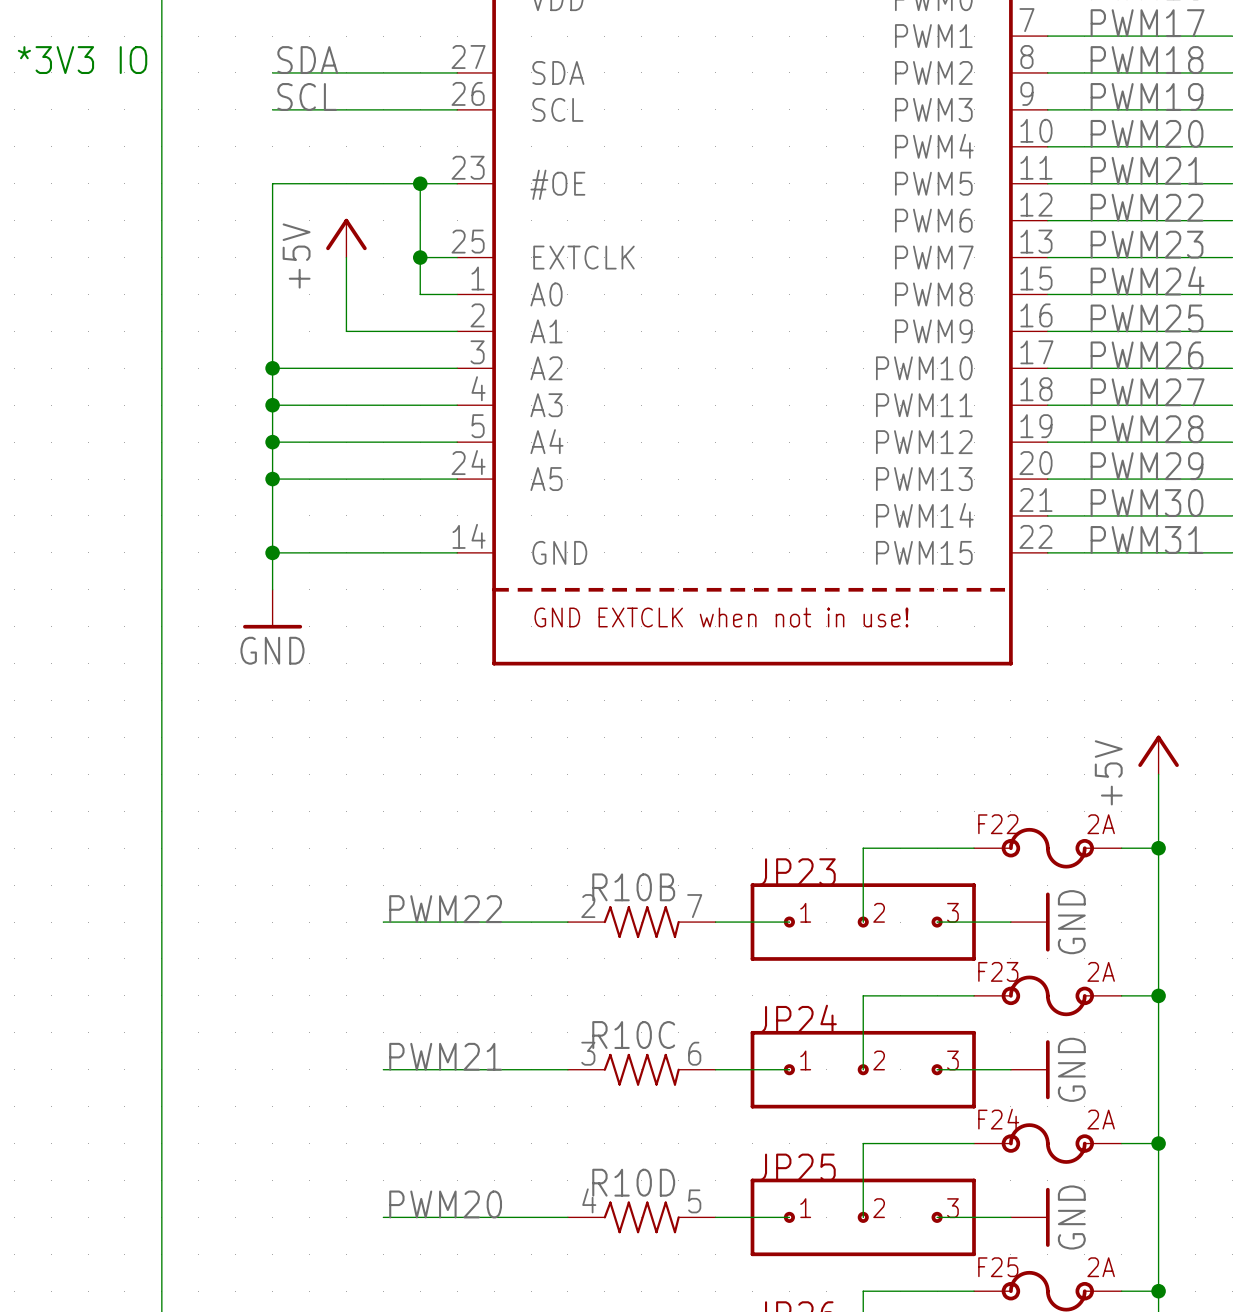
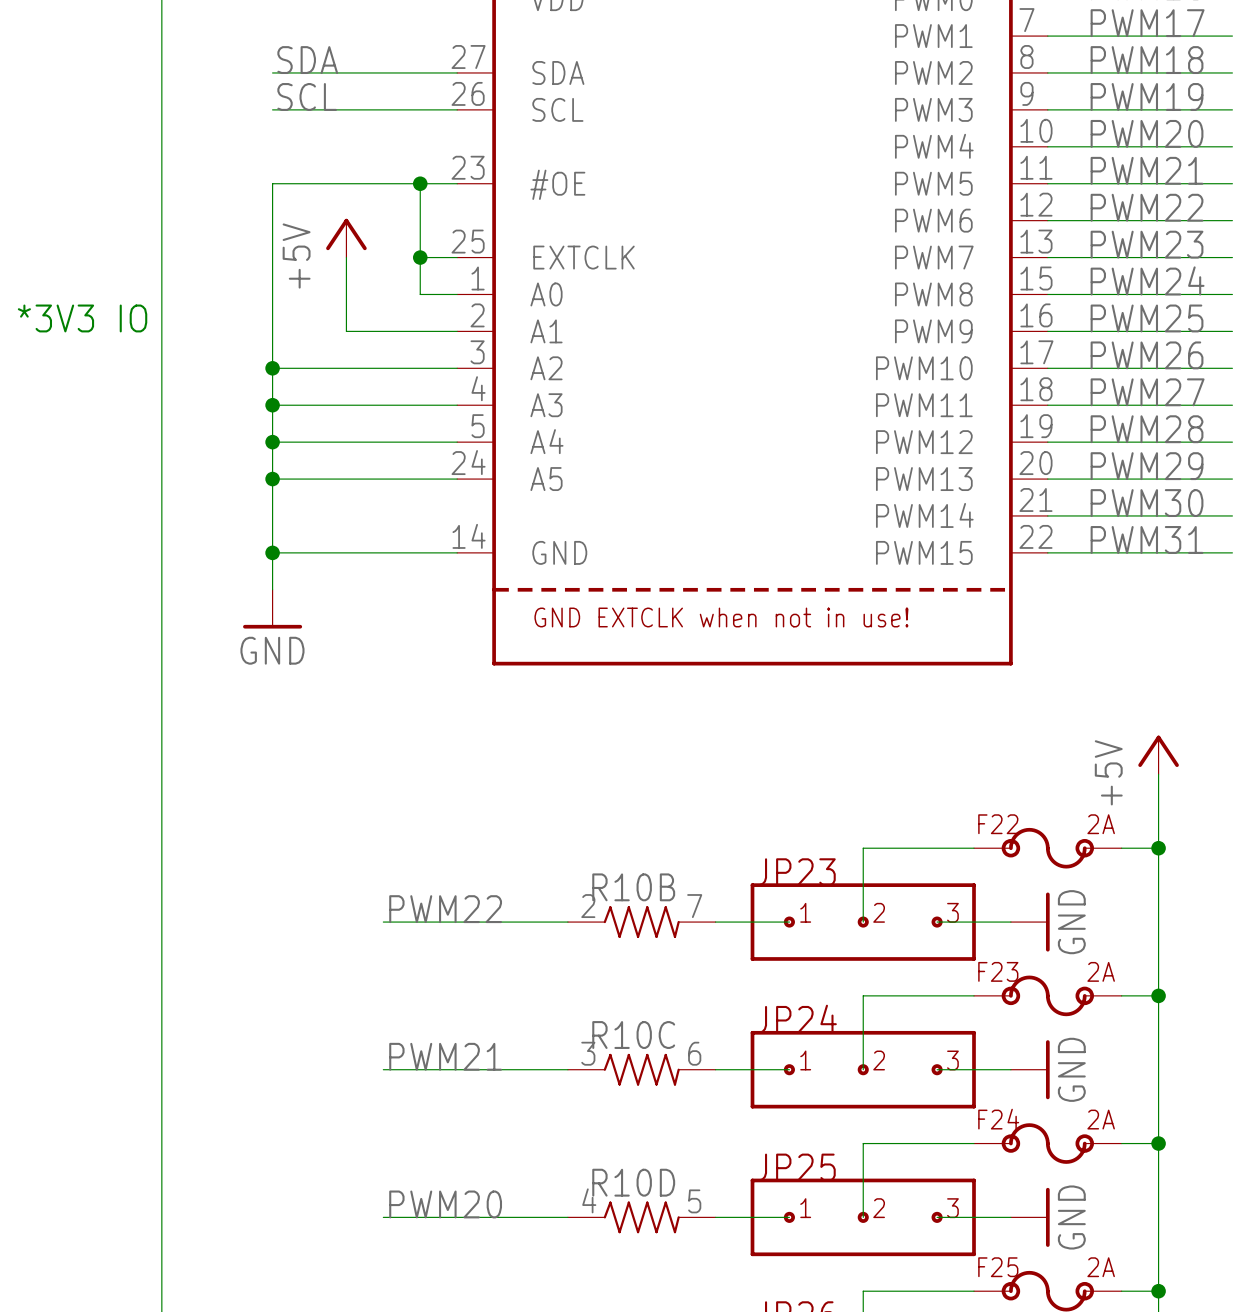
text position: *3V3 IO (82, 60) -> *3V3 IO (82, 318)

